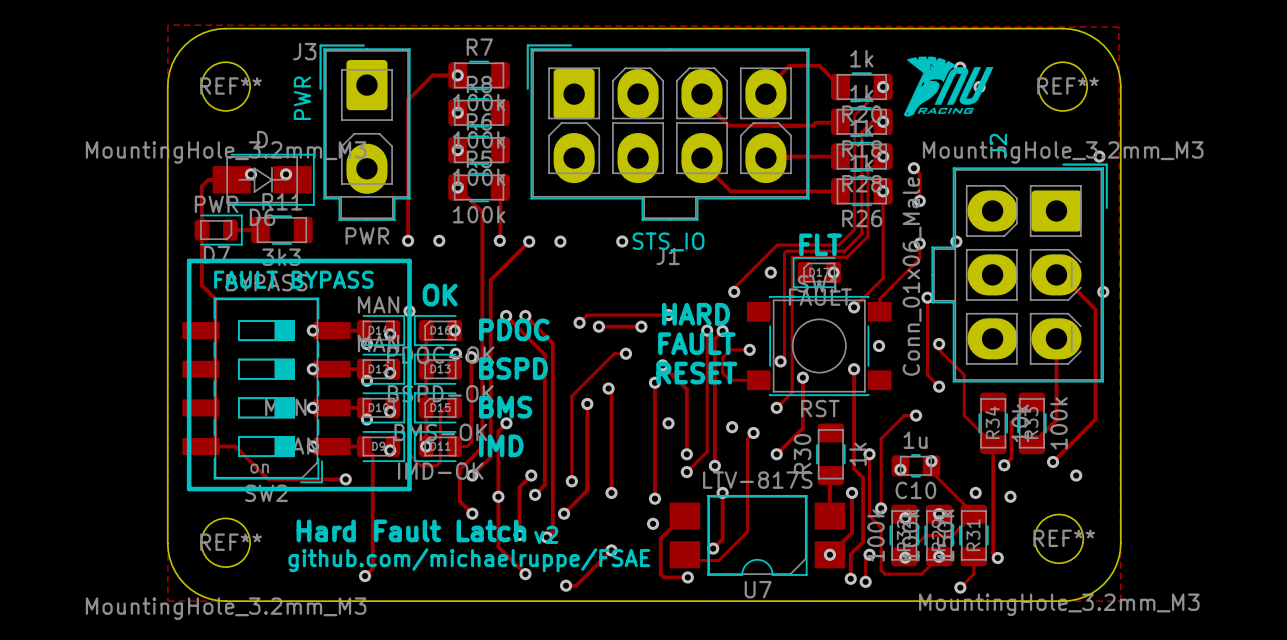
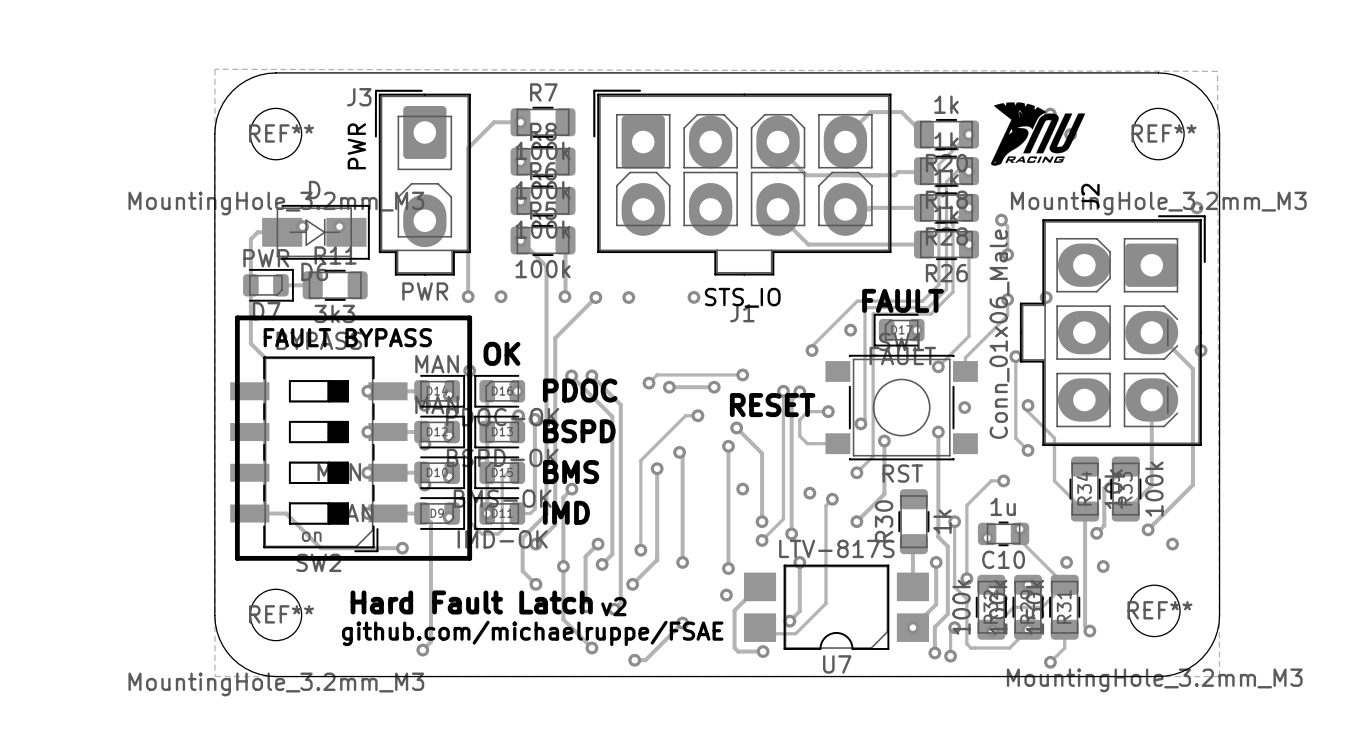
text: FLT (820, 244) -> FAULT (903, 300)
text: HARD (696, 314) -> none
text: FAULT (696, 343) -> RESET (772, 405)
text: RESET (696, 373) -> none

